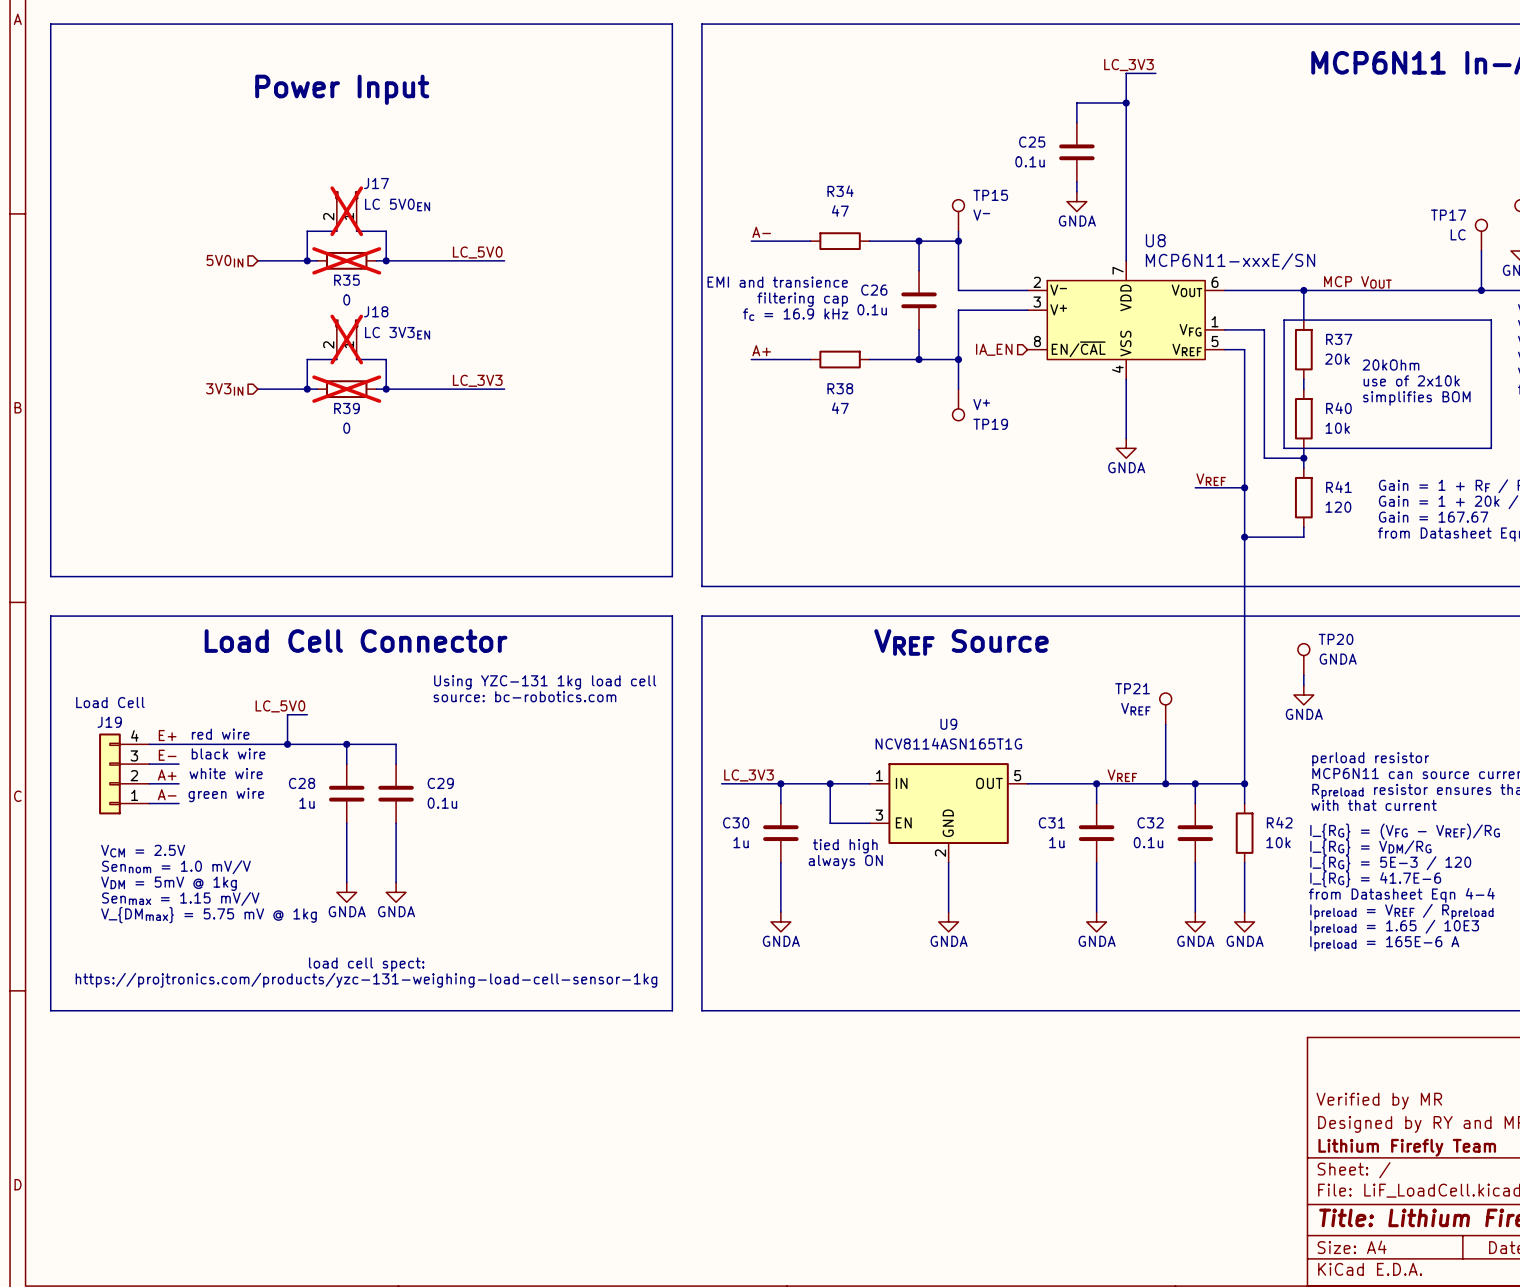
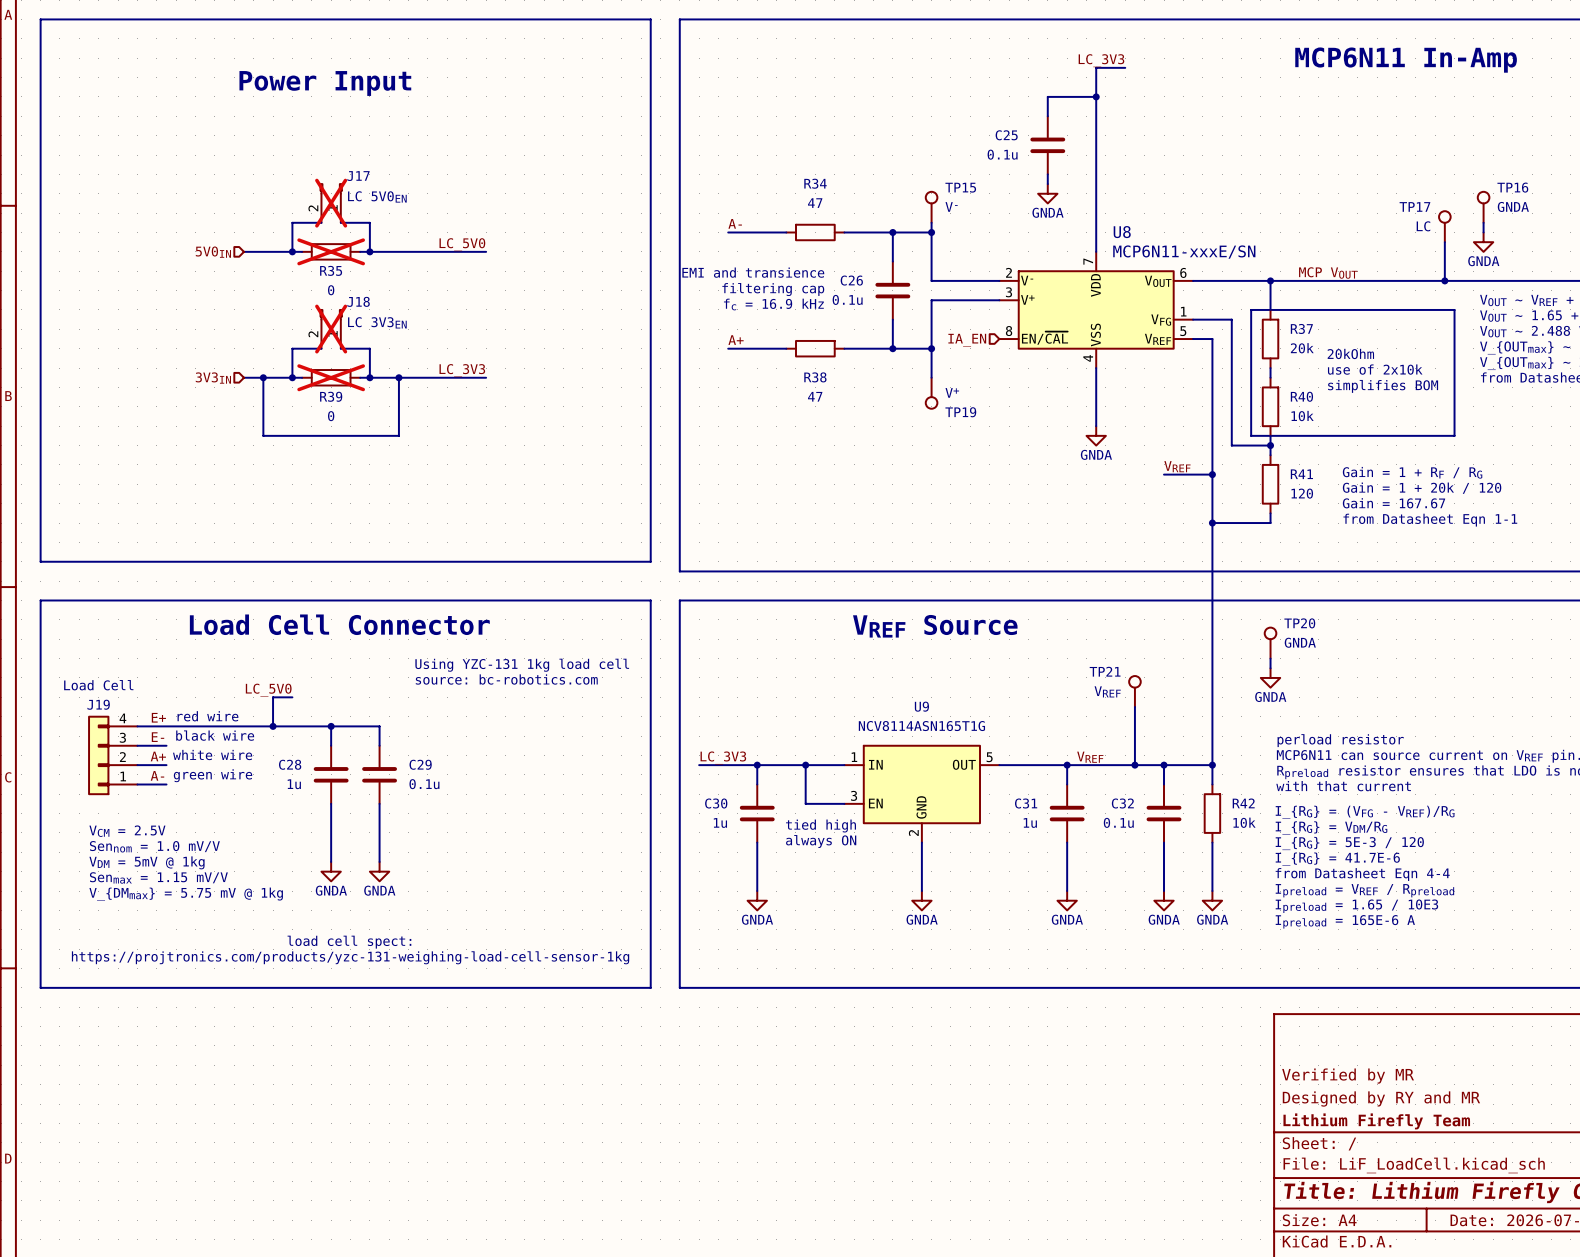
wire: none -> (263, 377) (263, 435) (398, 435) (398, 377)
junction: none -> (263, 377)
junction: none -> (398, 377)

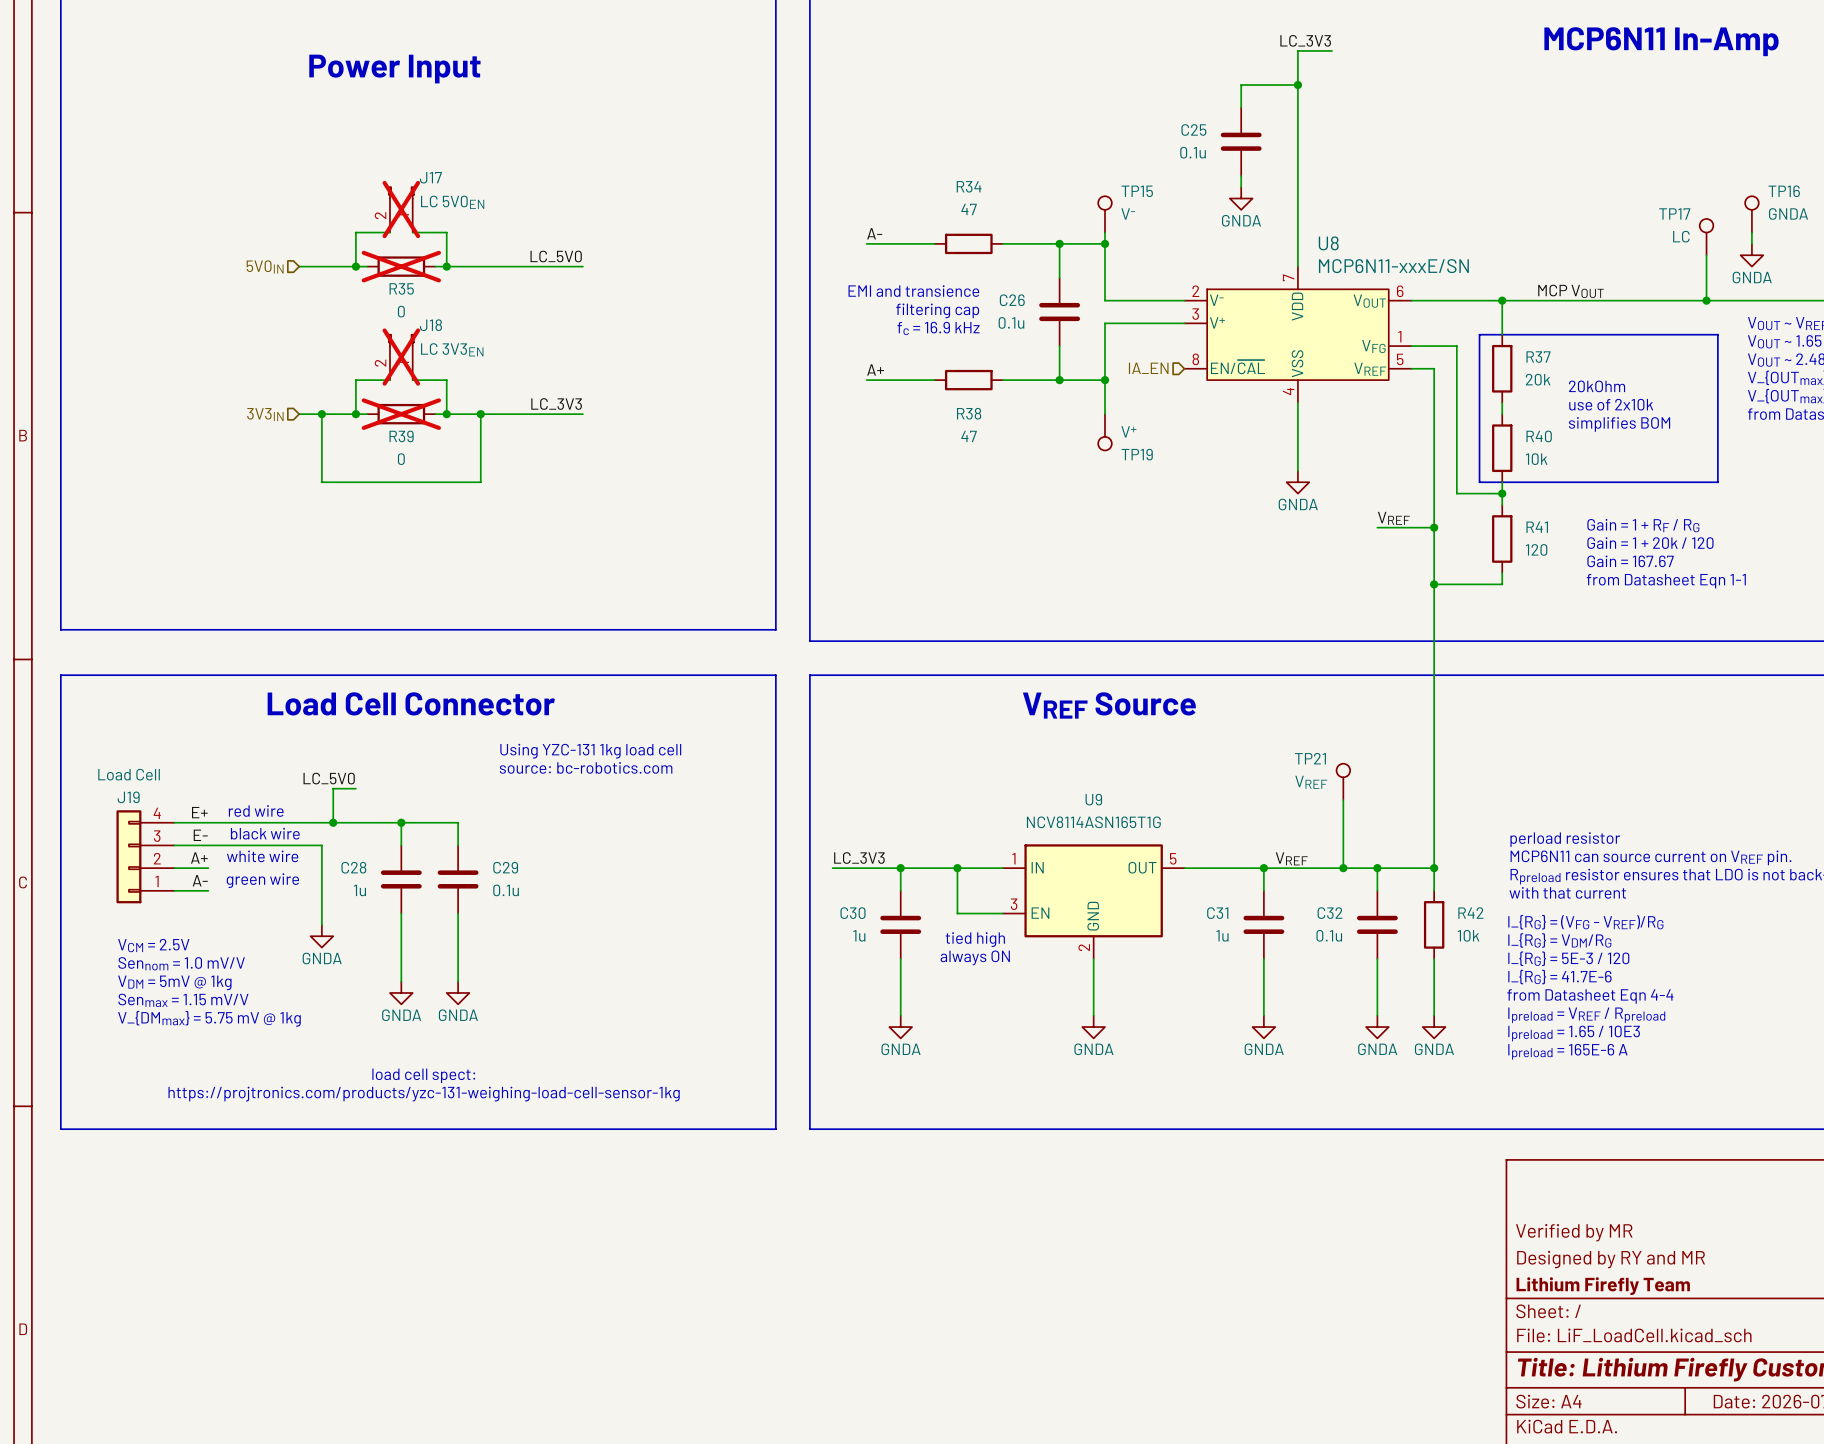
TP20: GNDA (1270, 643) -> none
wire: (1270, 658) (1270, 668) -> none
power symbol: GNDA (1270, 677) -> none
wire: none -> (208, 845) (321, 845) (321, 924)
power symbol: none -> GNDA (321, 936)

